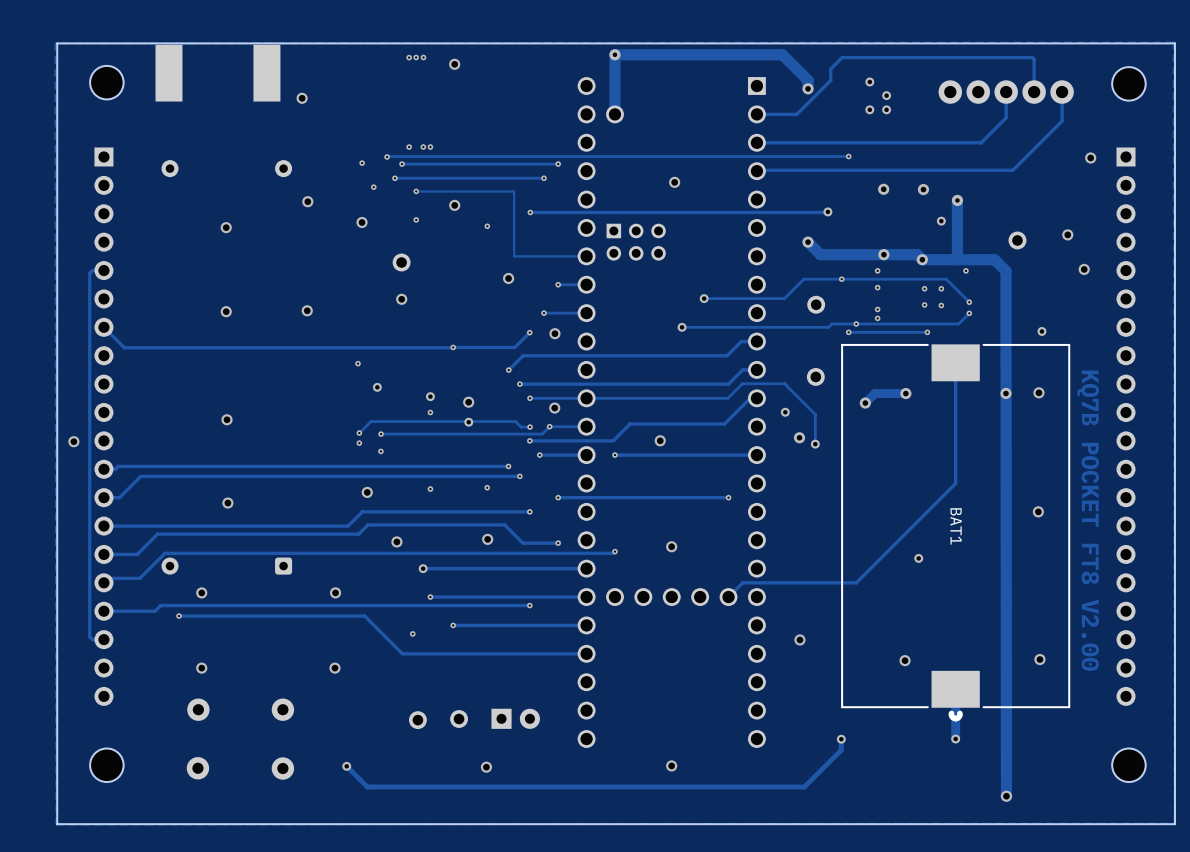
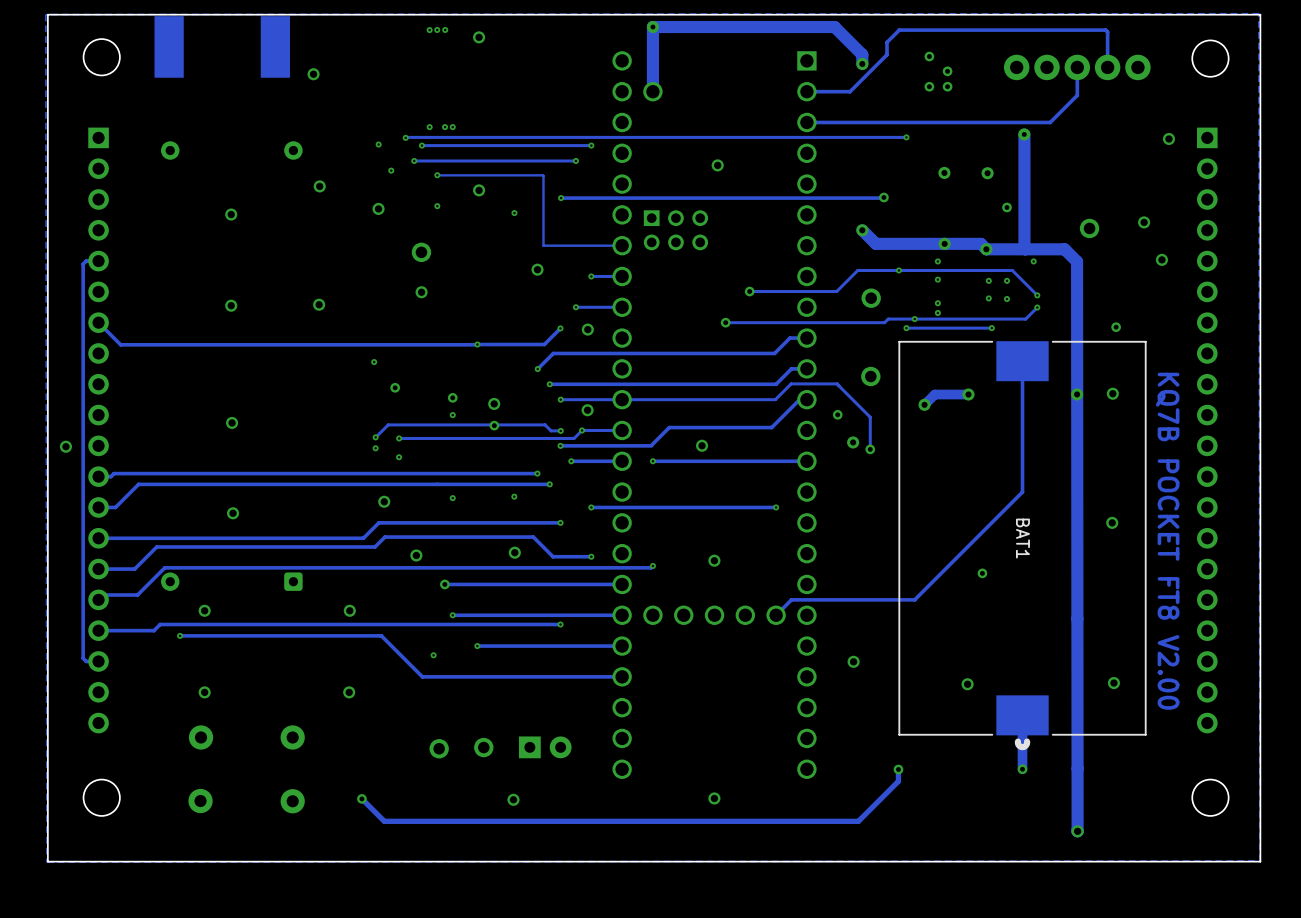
track: (1062, 92) (1062, 121) (1012, 170) (756, 171) -> none
track: none -> (1024, 134) (1024, 185)
via position: (957, 200) -> (1024, 134)

